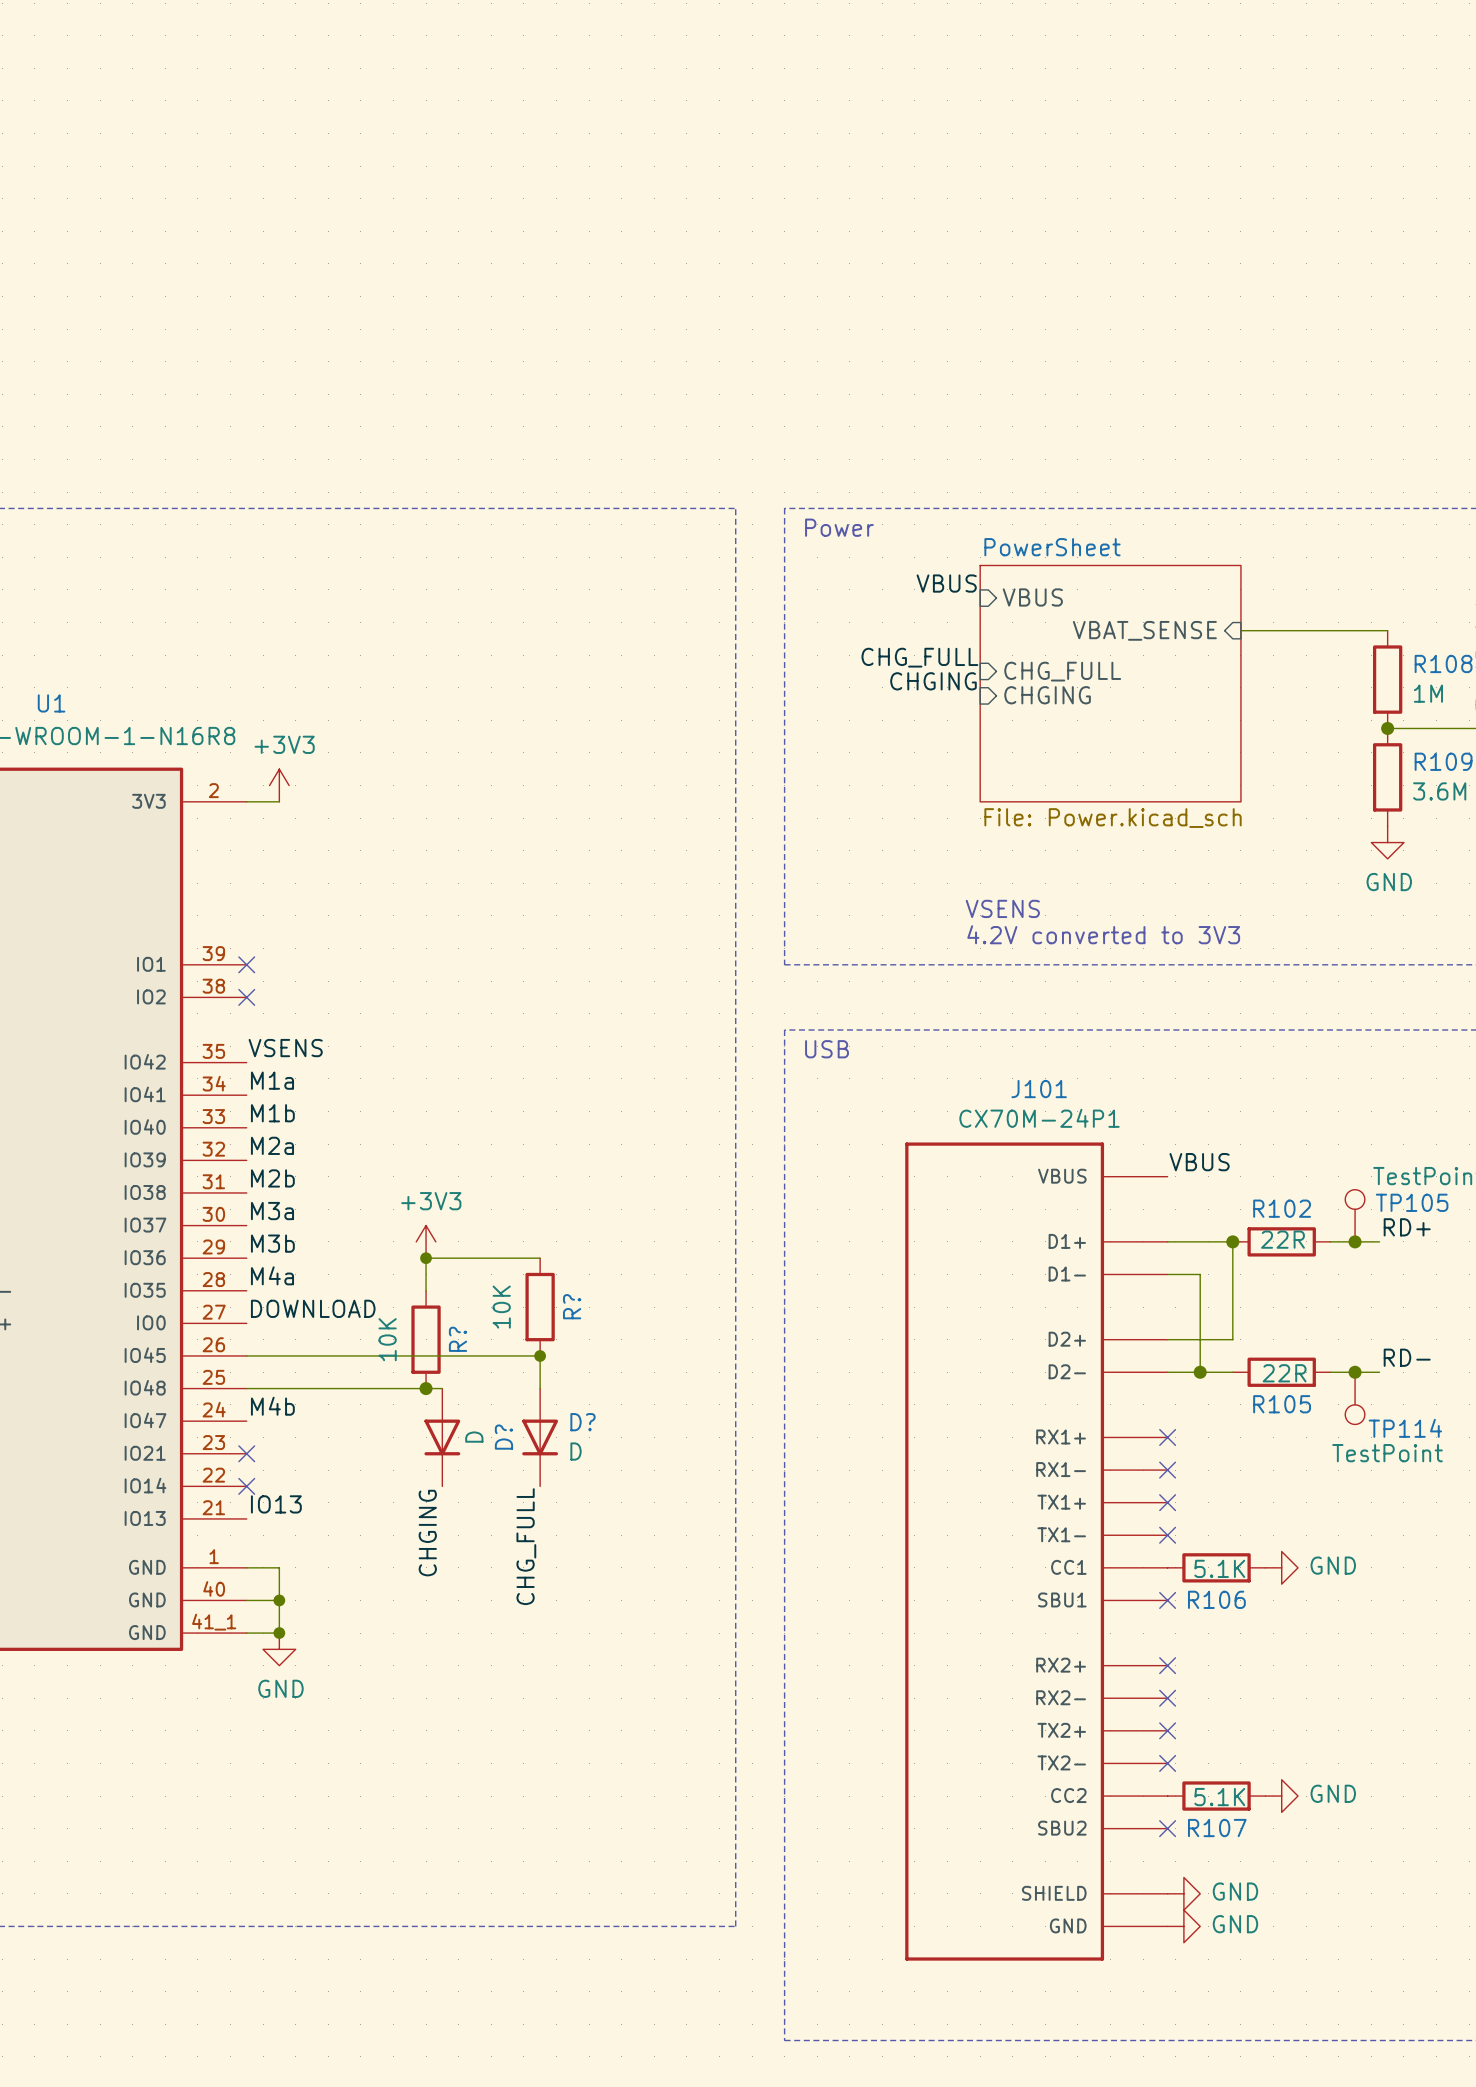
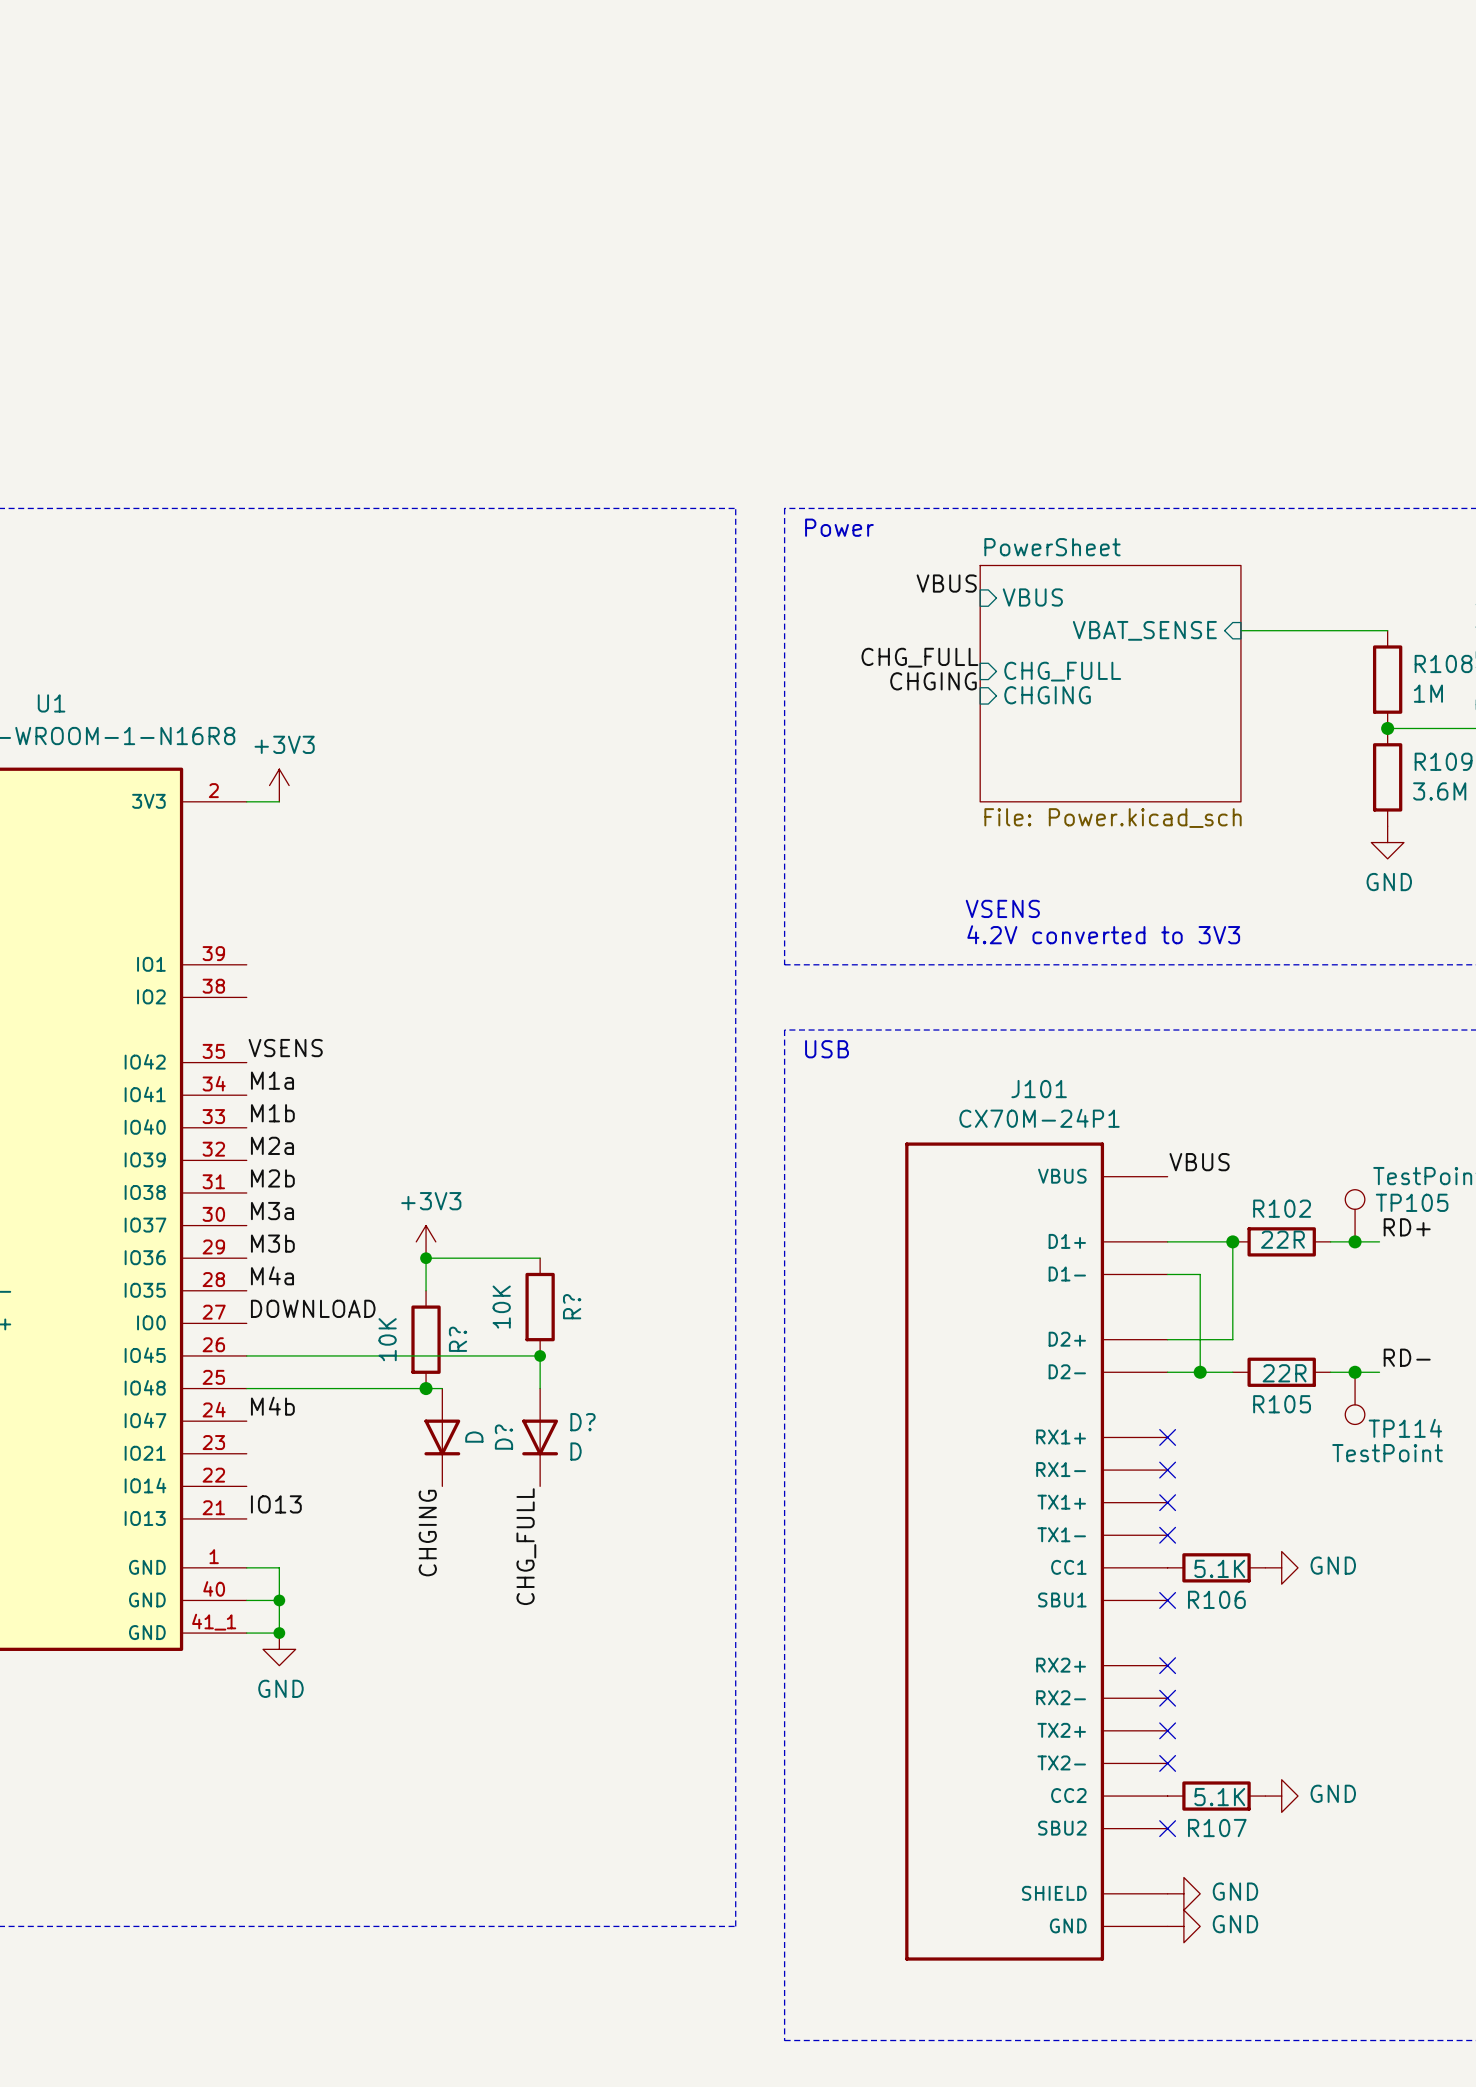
no-connect mark: (246, 964) -> none
no-connect mark: (246, 997) -> none
no-connect mark: (246, 1453) -> none
no-connect mark: (246, 1486) -> none

